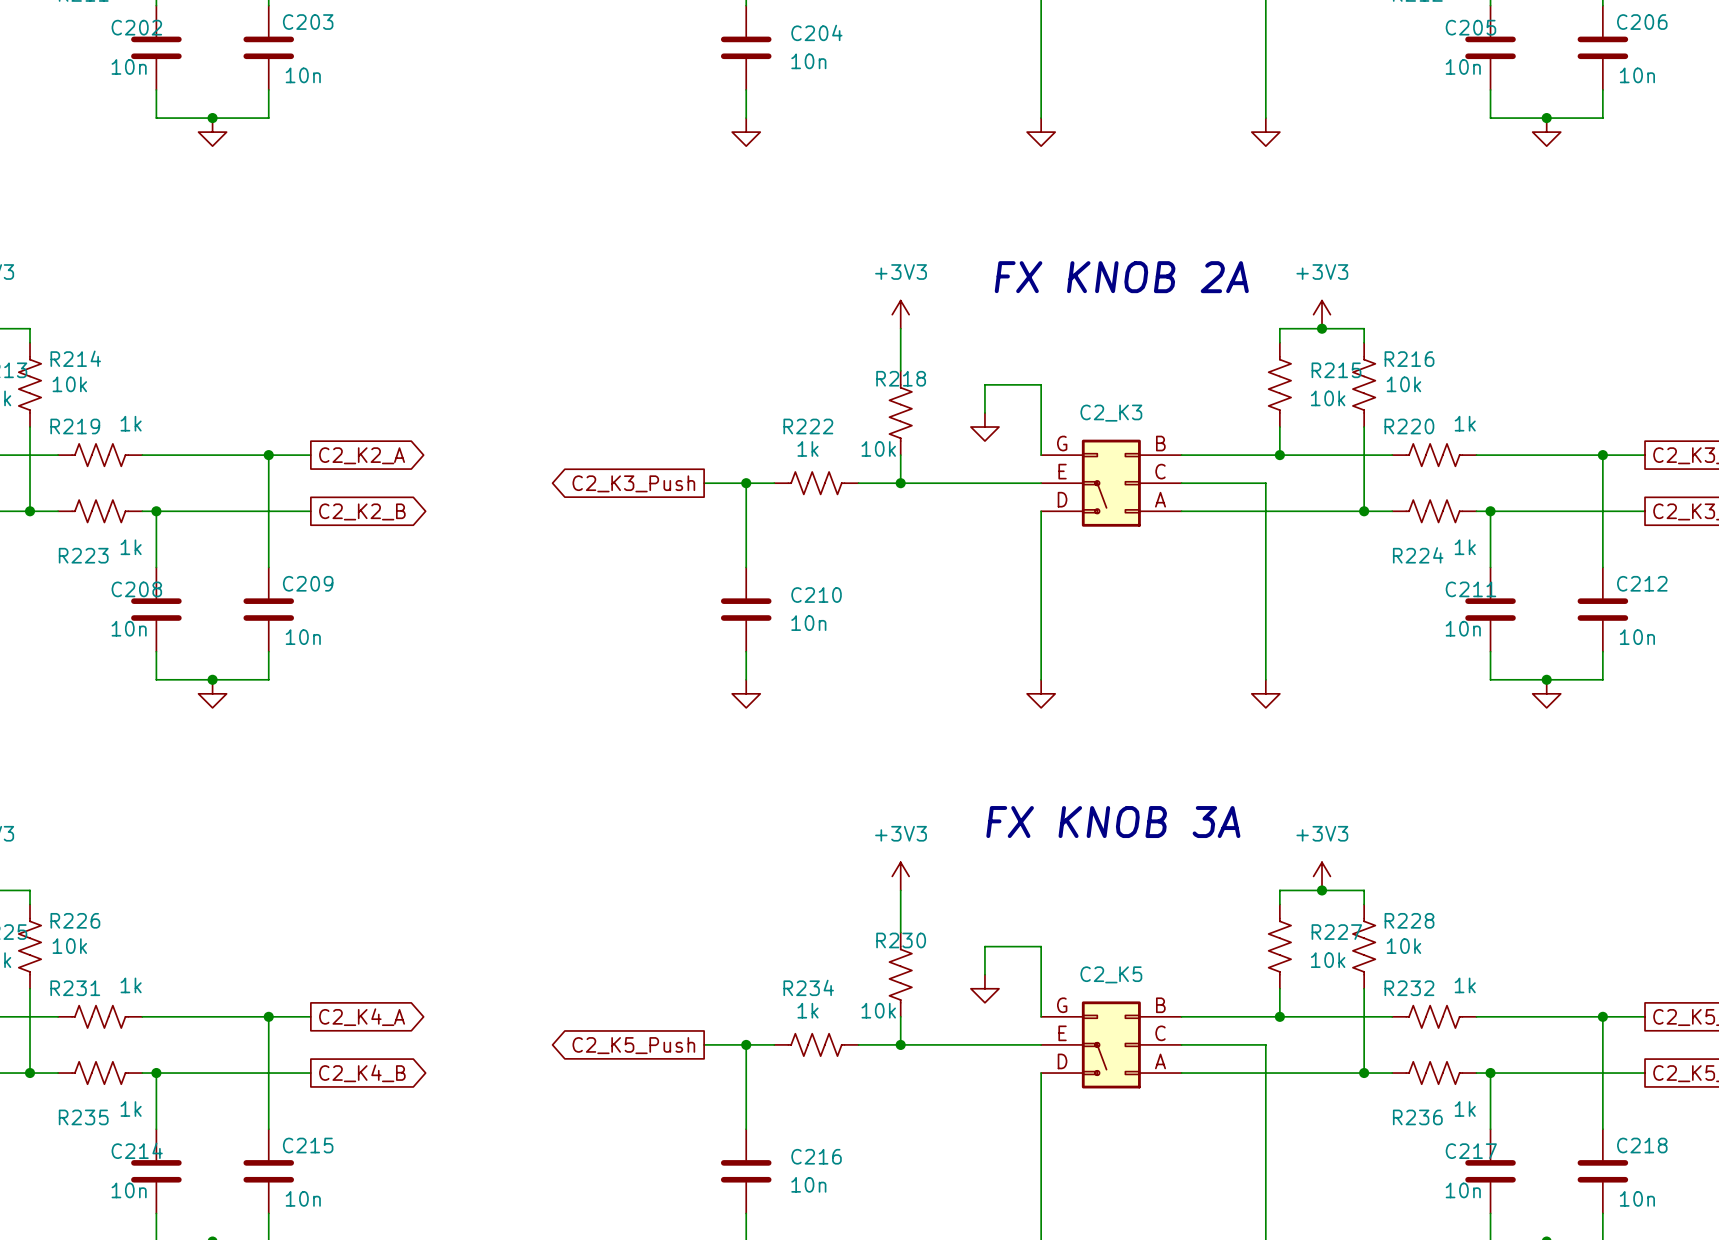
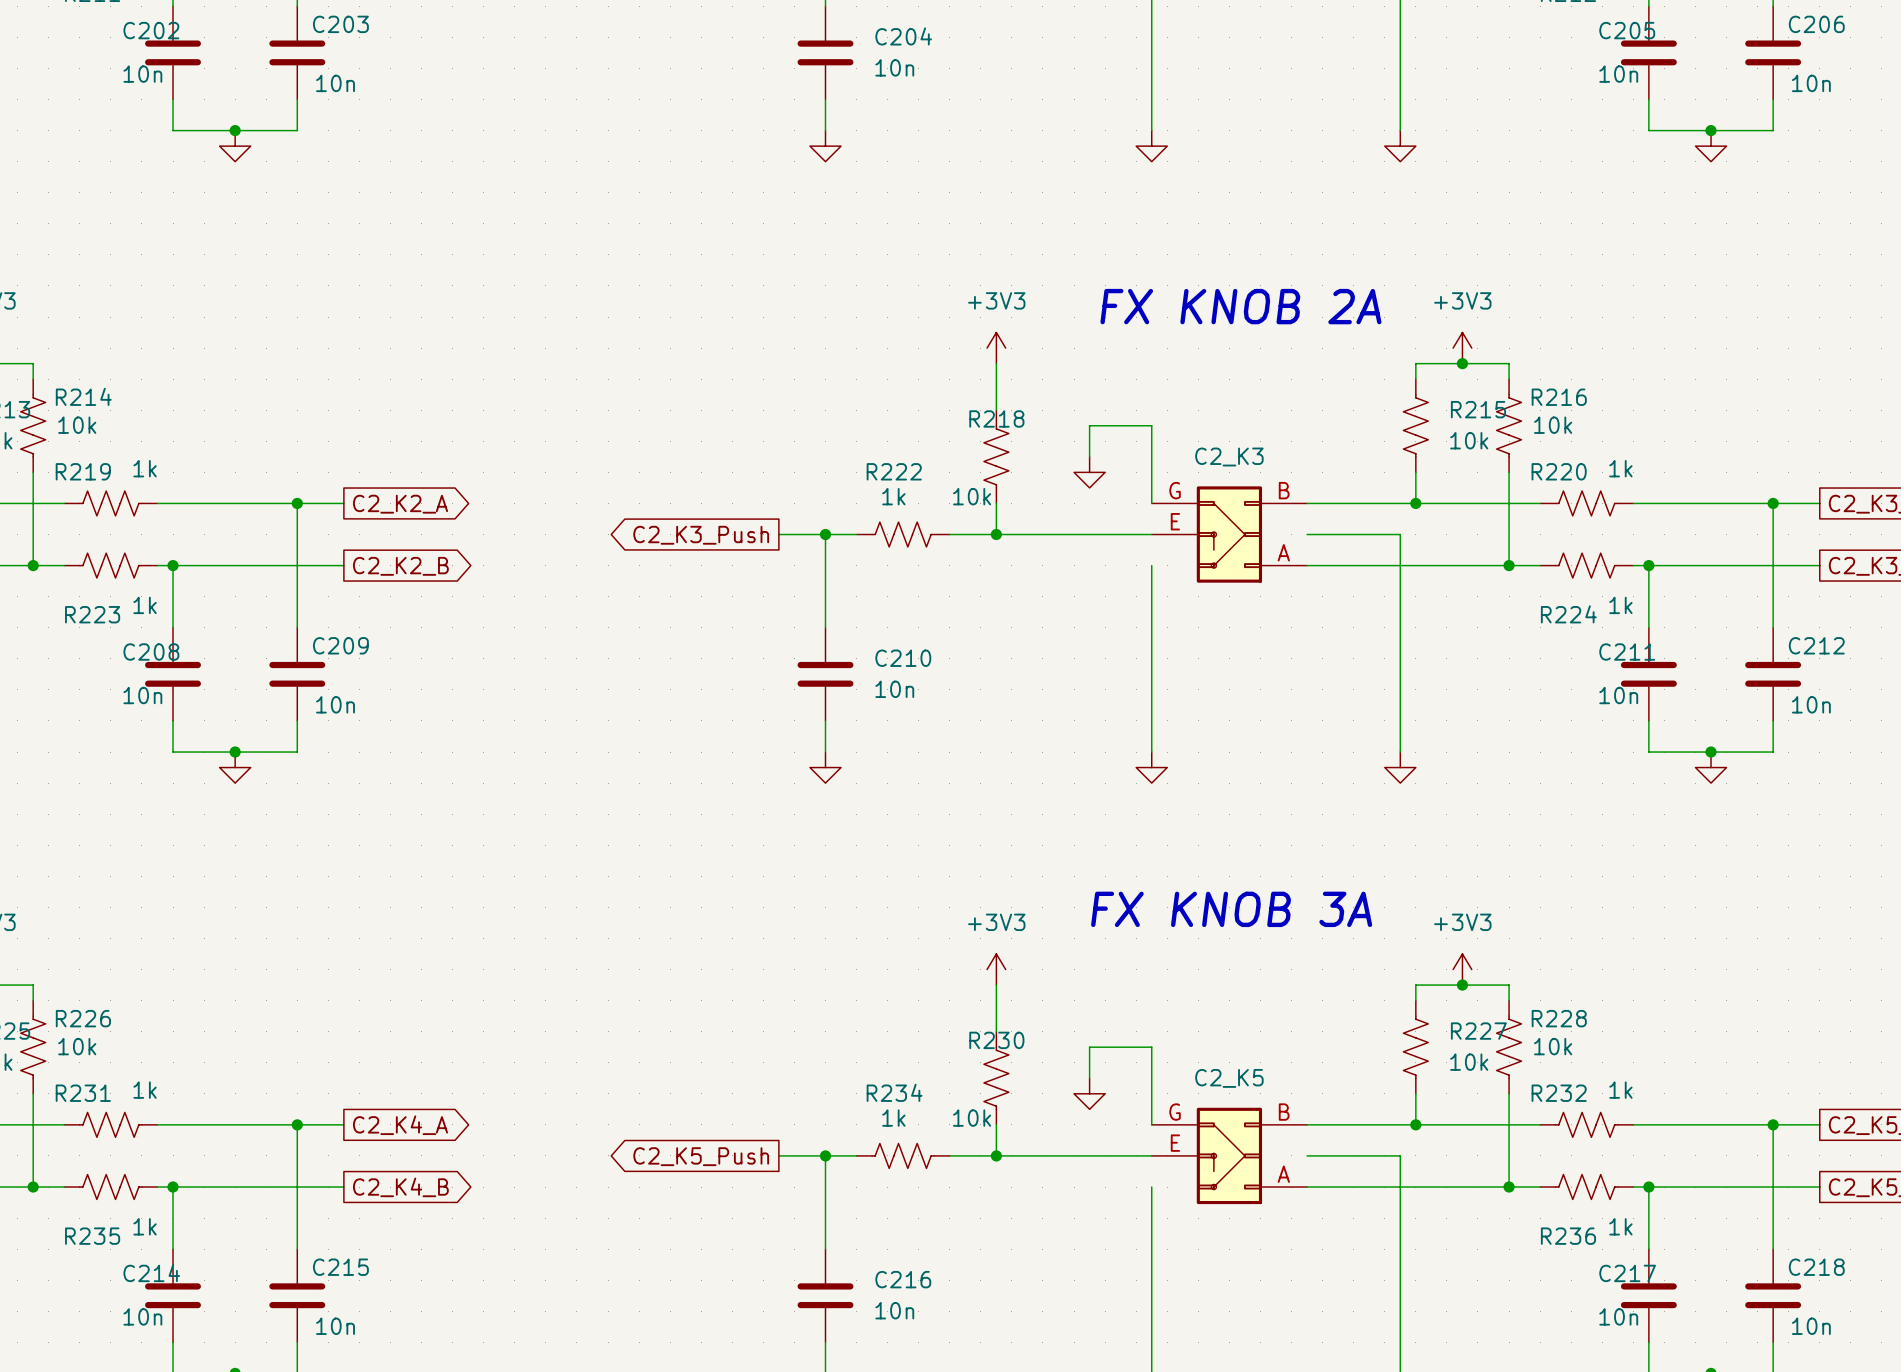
part symbol: [1041, 439, 1182, 527] -> [1151, 486, 1308, 583]
part symbol: [1041, 1001, 1182, 1089] -> [1151, 1107, 1308, 1205]

